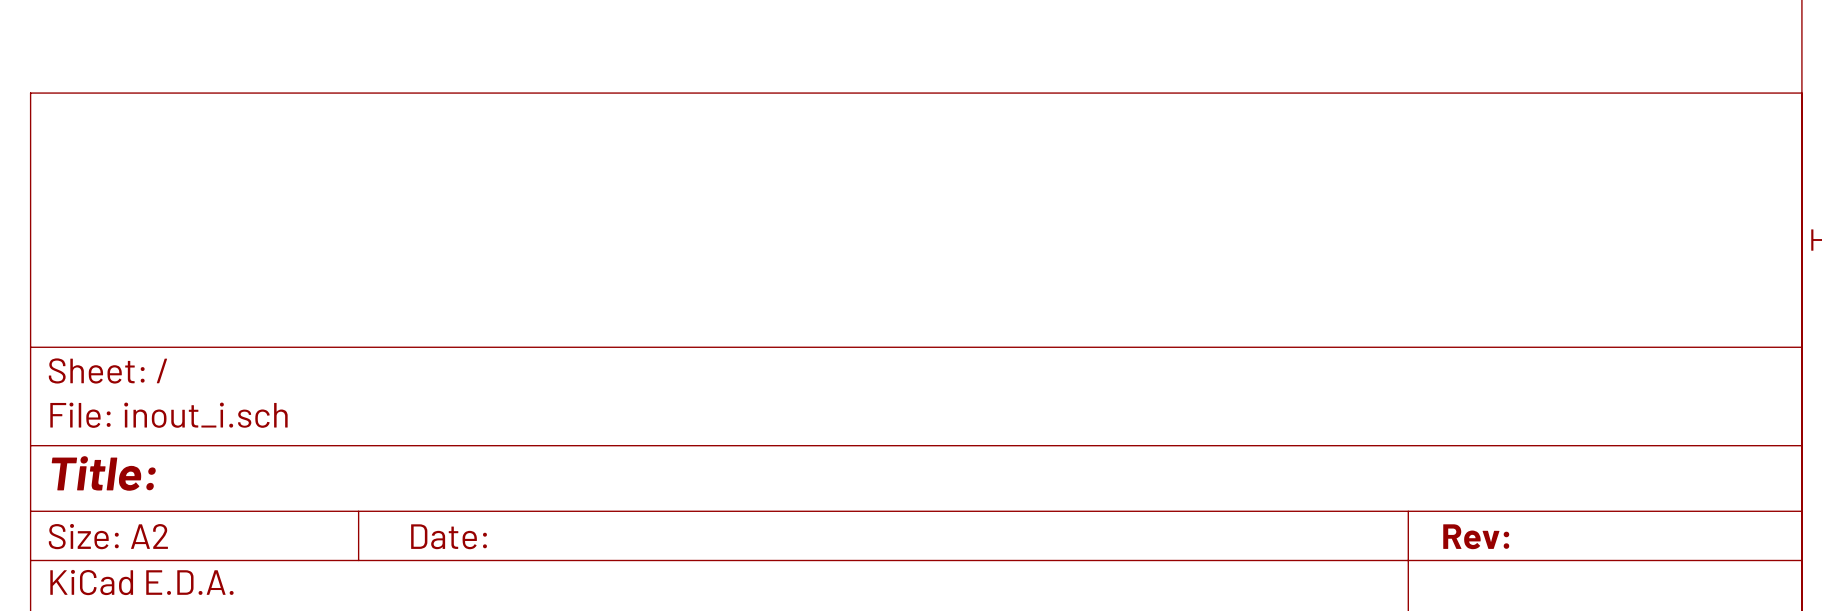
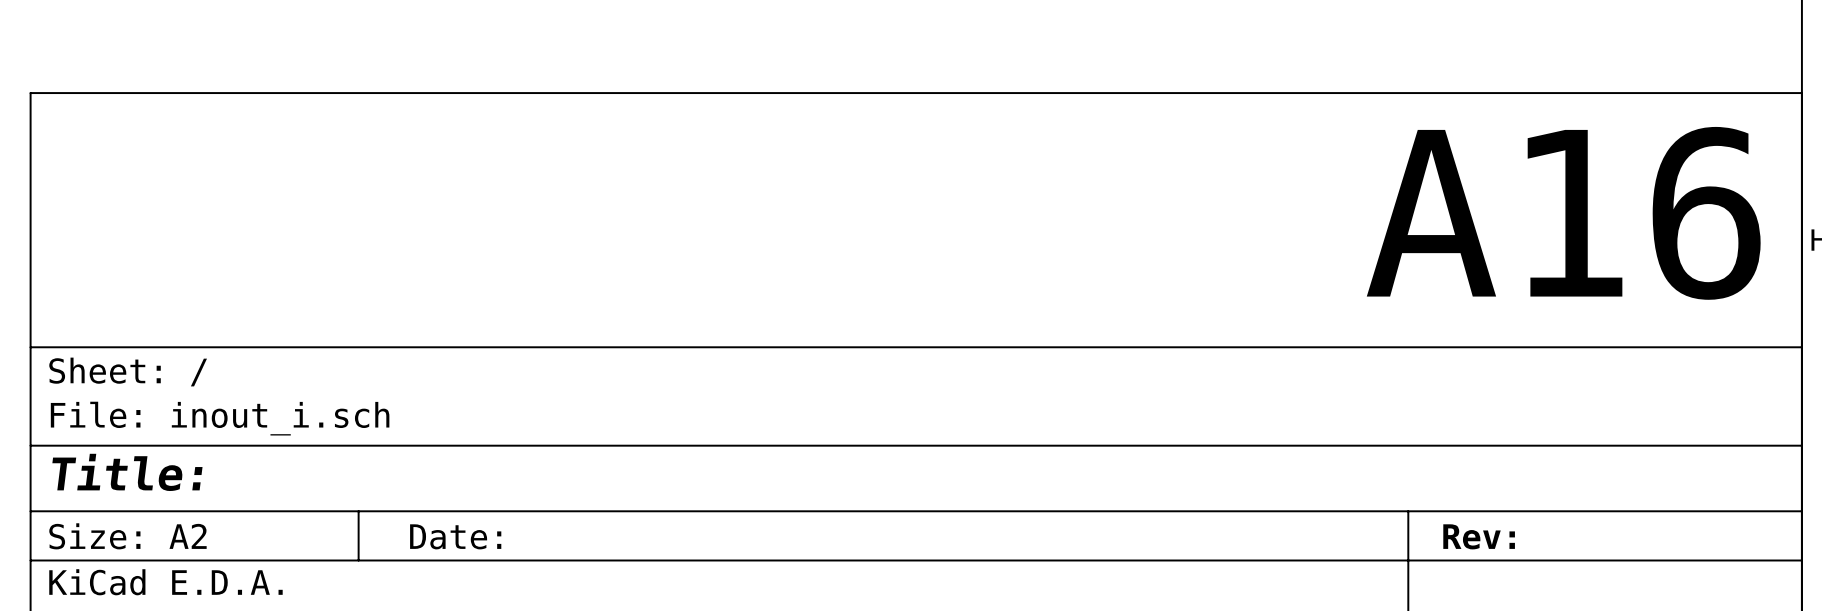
text: none -> A16 (1563, 213)

